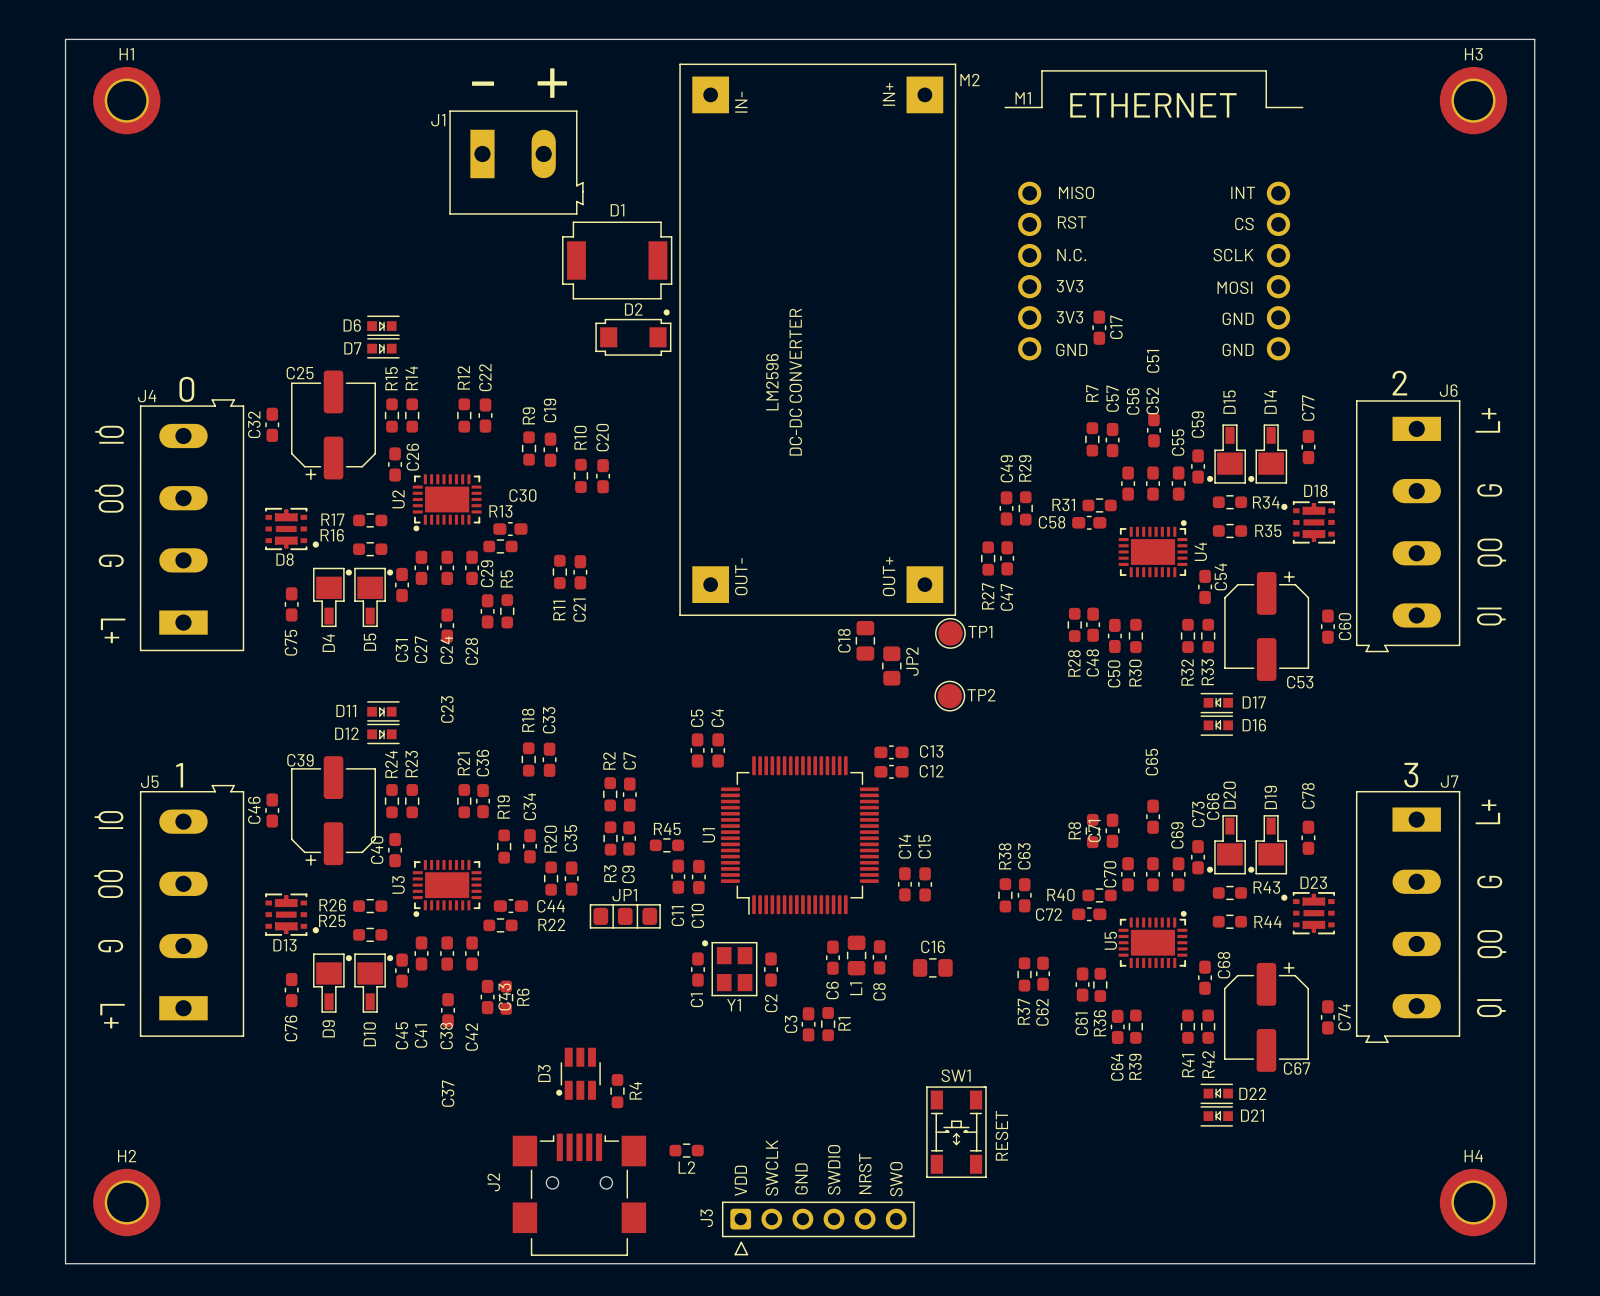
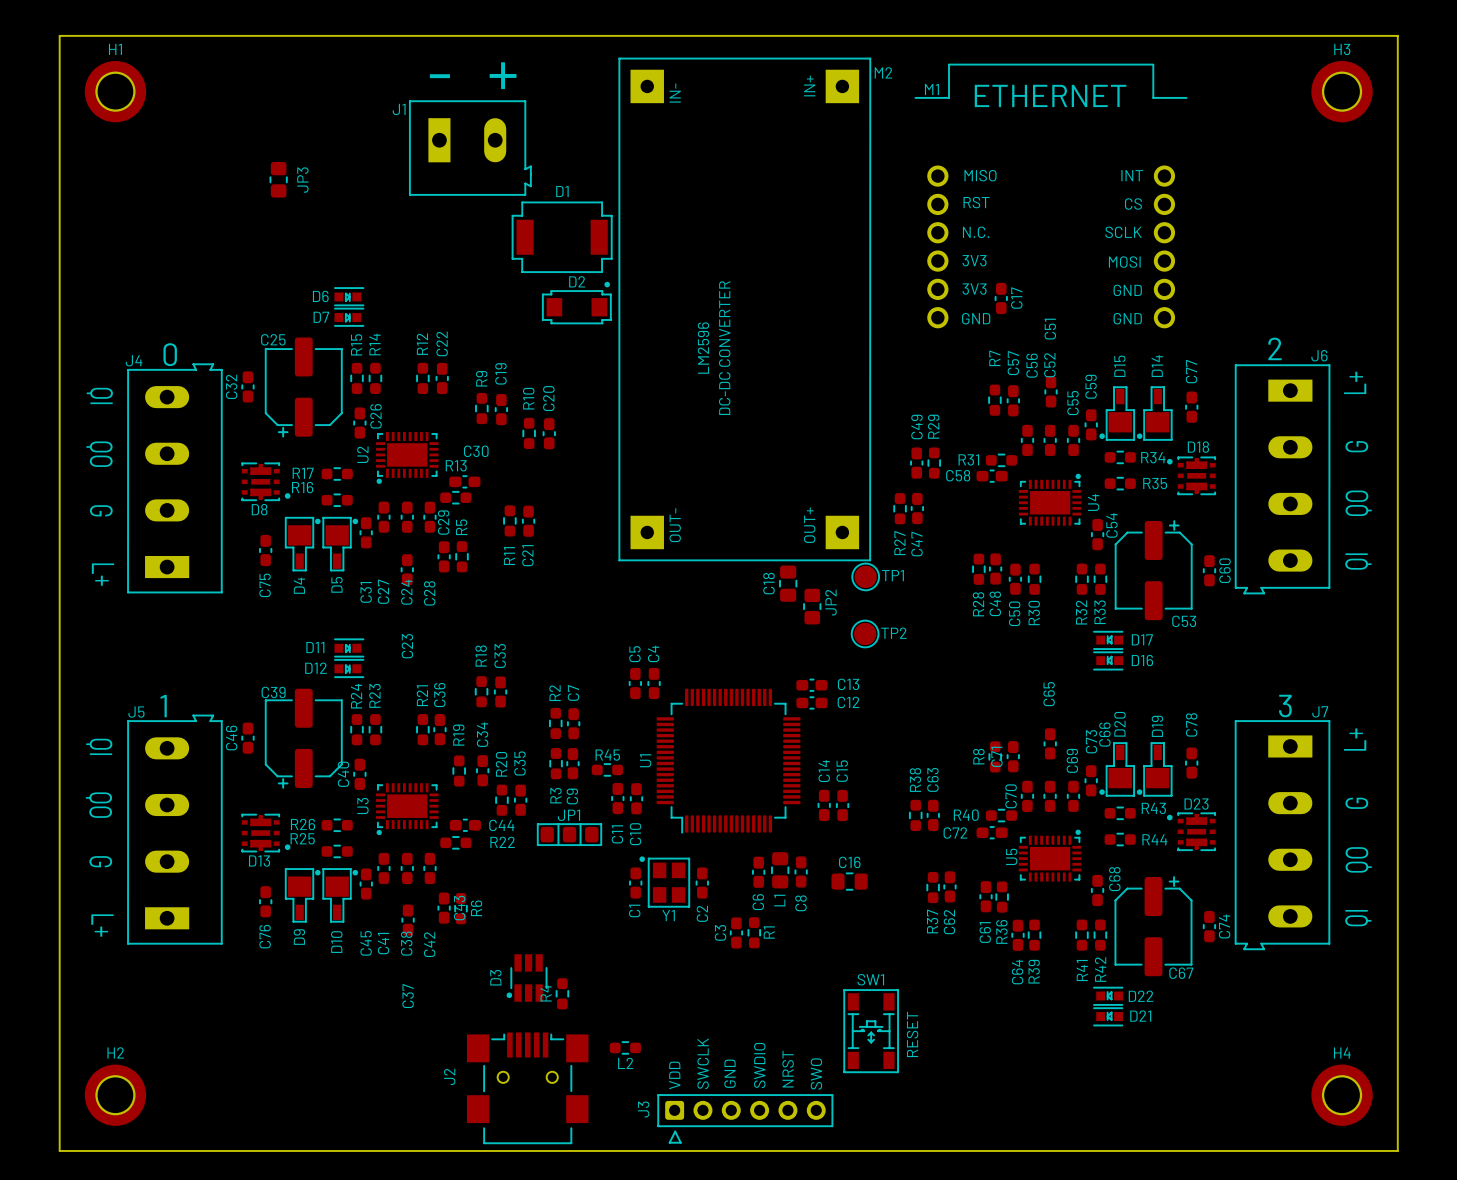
JP3: none -> (278, 179)
R4 name position: R4 (635, 1090) -> R4 (546, 993)

